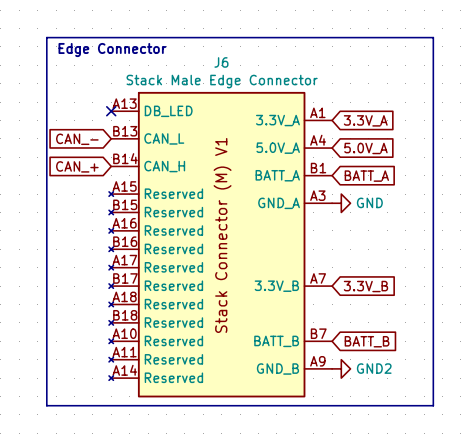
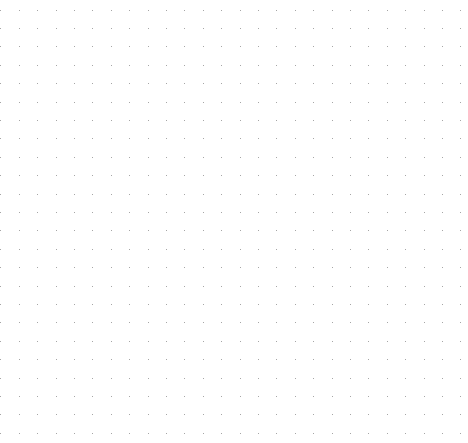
line: (46, 37) (433, 37) (433, 405) (46, 405) (46, 37) -> none
text: Edge Connector (112, 50) -> none
no-connect mark: (111, 111) -> none
global label: 3.3V_A (365, 120) -> none
global label: CAN_- (77, 139) -> none
global label: 5.0V_A (365, 148) -> none
global label: CAN_+ (77, 166) -> none
global label: BATT_A (366, 176) -> none
power symbol: GND (341, 203) -> none
J6: Stack Male Edge Connector (220, 244) -> none
global label: 3.3V_B (365, 286) -> none
global label: BATT_B (367, 341) -> none
power symbol: GND2 (341, 368) -> none

